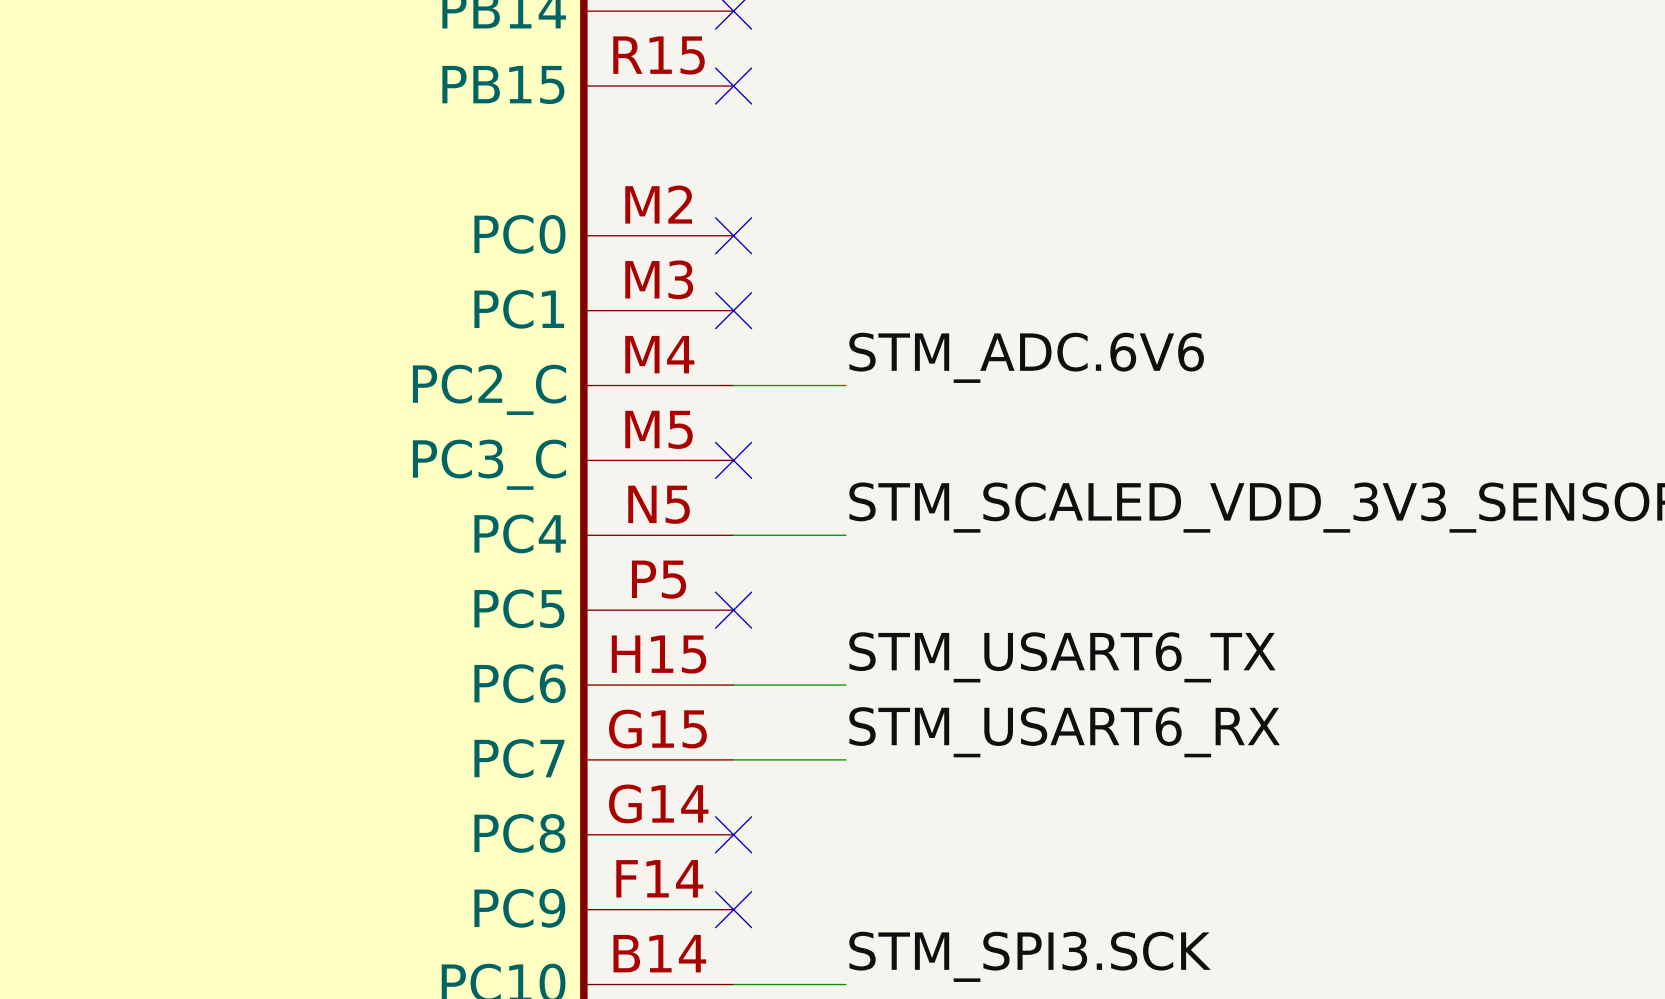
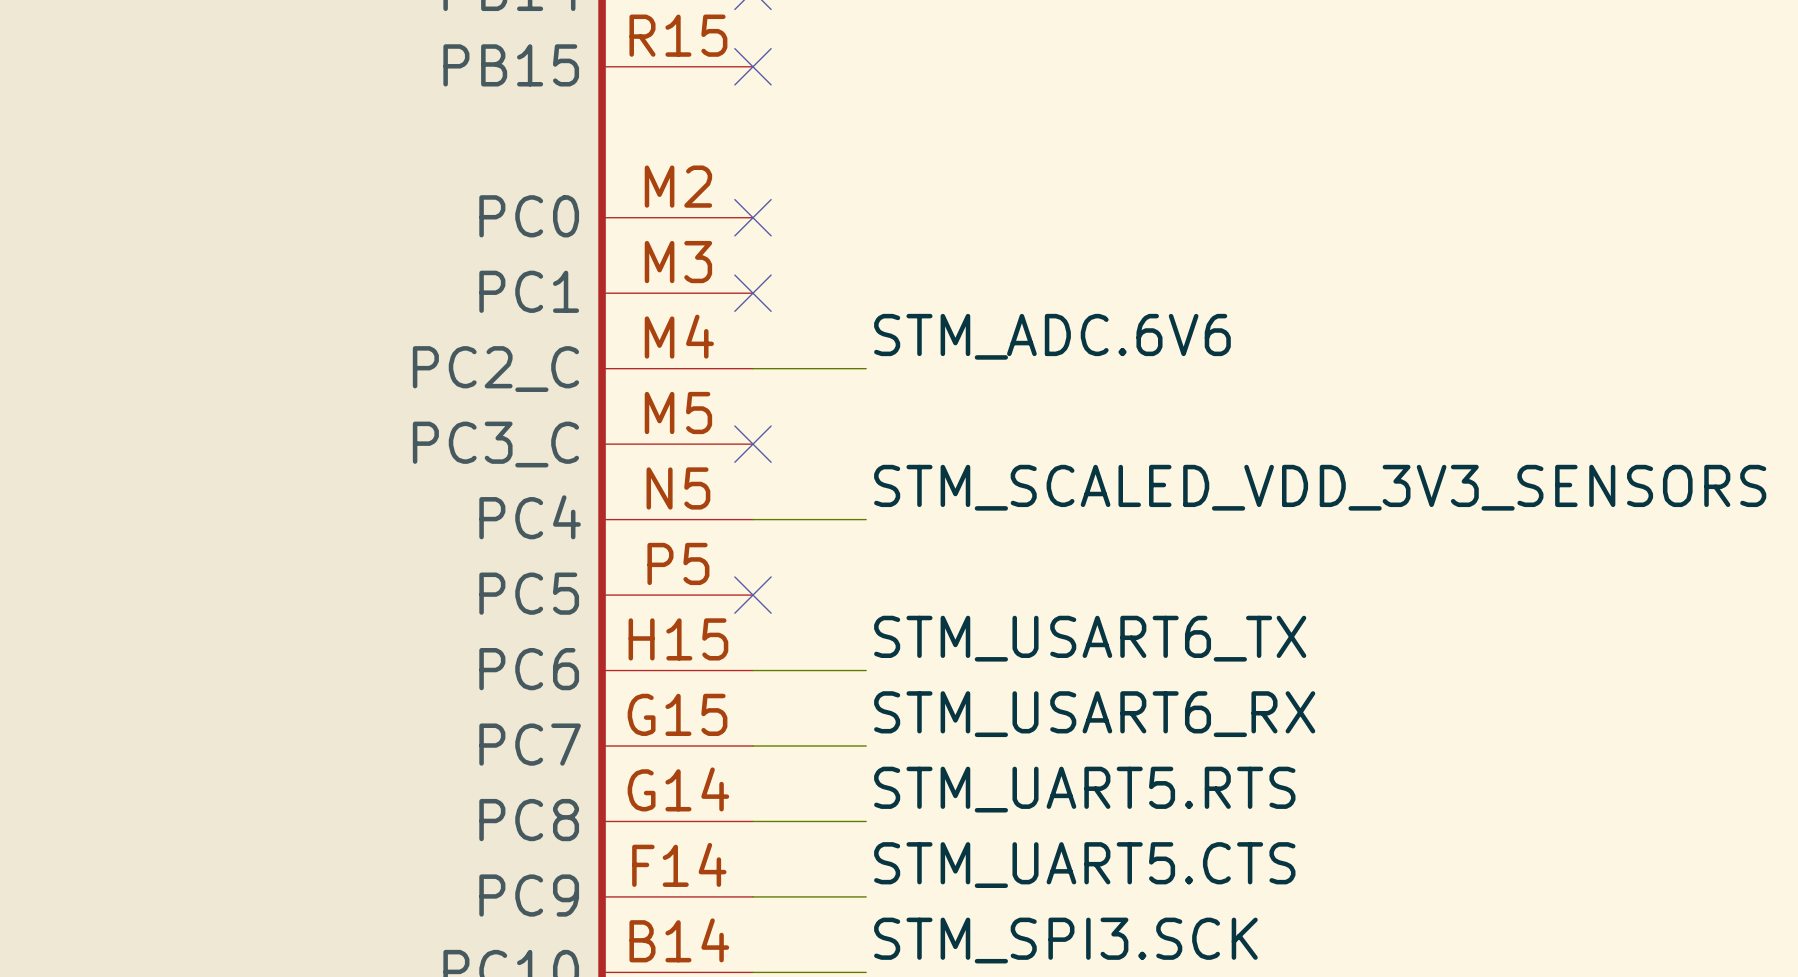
label: none -> STM_UART5.RTS (1084, 789)
wire: none -> (752, 821) (866, 821)
no-connect mark: (733, 834) -> none
label: none -> STM_UART5.CTS (1084, 865)
wire: none -> (752, 896) (866, 896)
no-connect mark: (733, 909) -> none

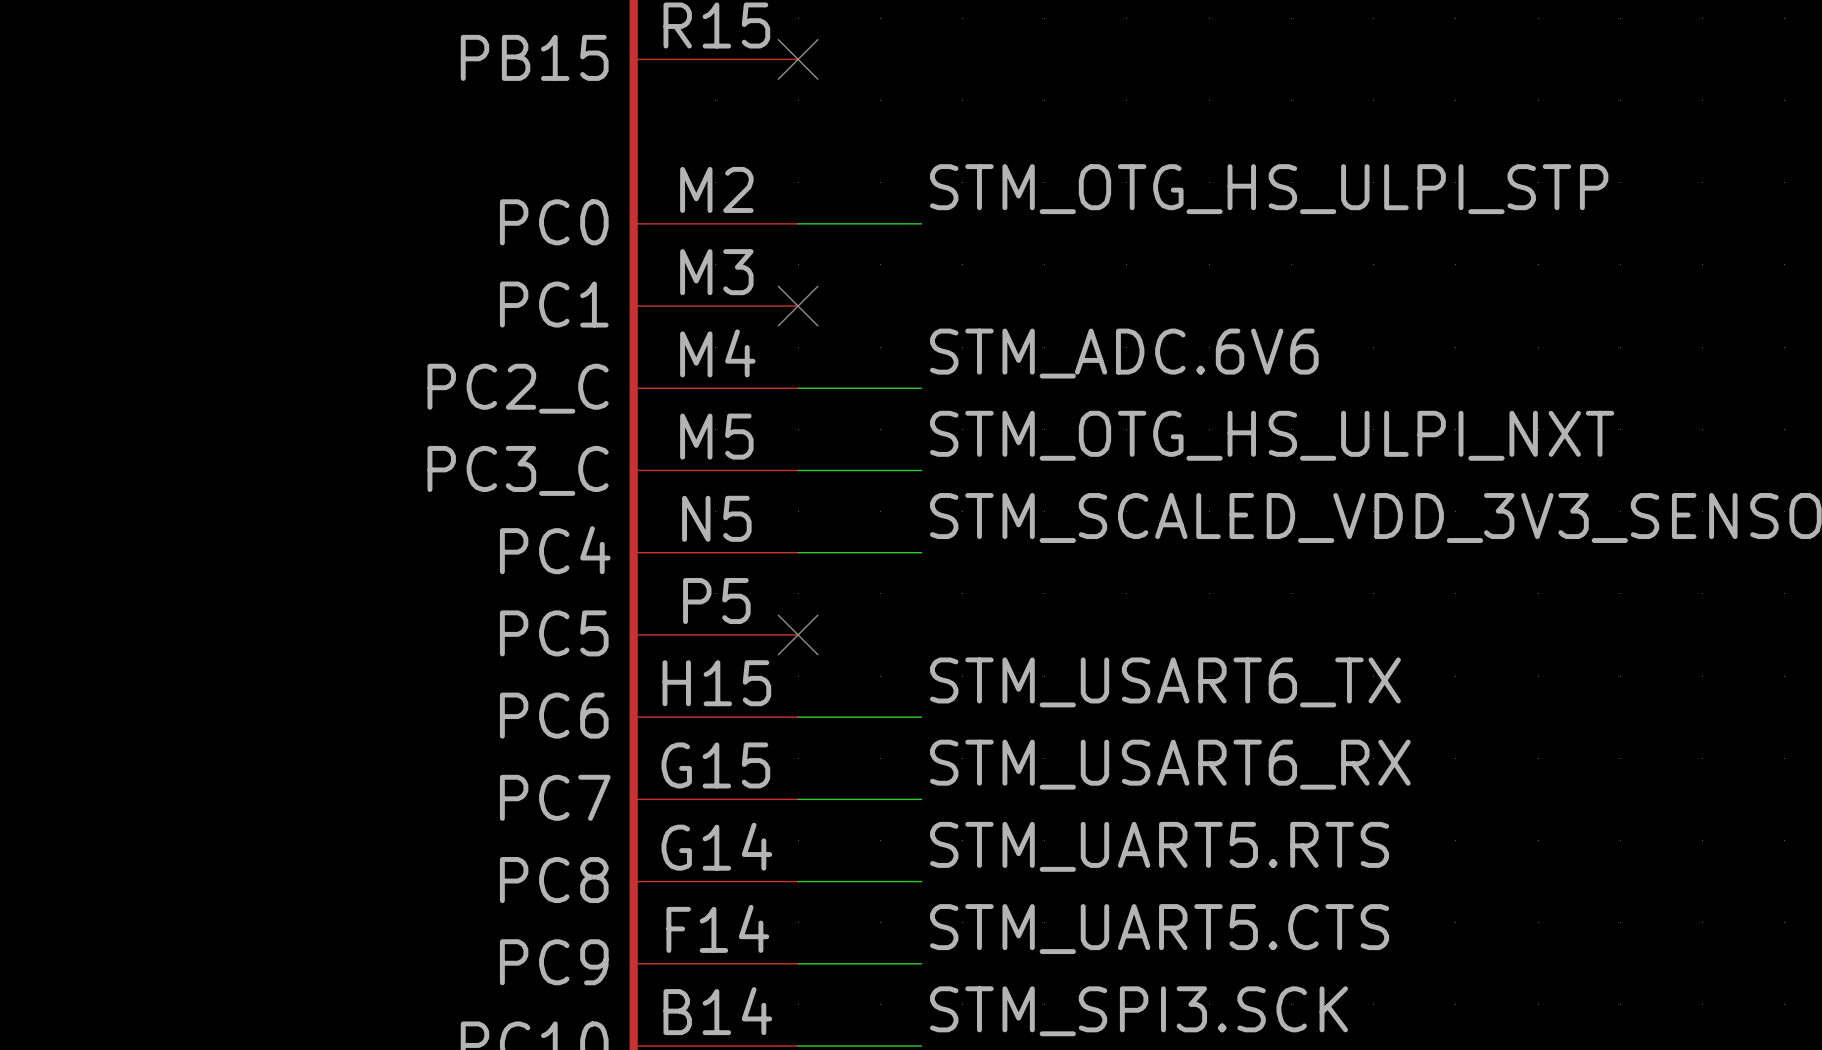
label: none -> STM_OTG_HS_ULPI_STP (1269, 189)
wire: none -> (798, 223) (921, 223)
no-connect mark: (752, 217) -> none
label: none -> STM_OTG_HS_ULPI_NXT (1272, 435)
wire: none -> (798, 470) (921, 470)
no-connect mark: (752, 444) -> none

